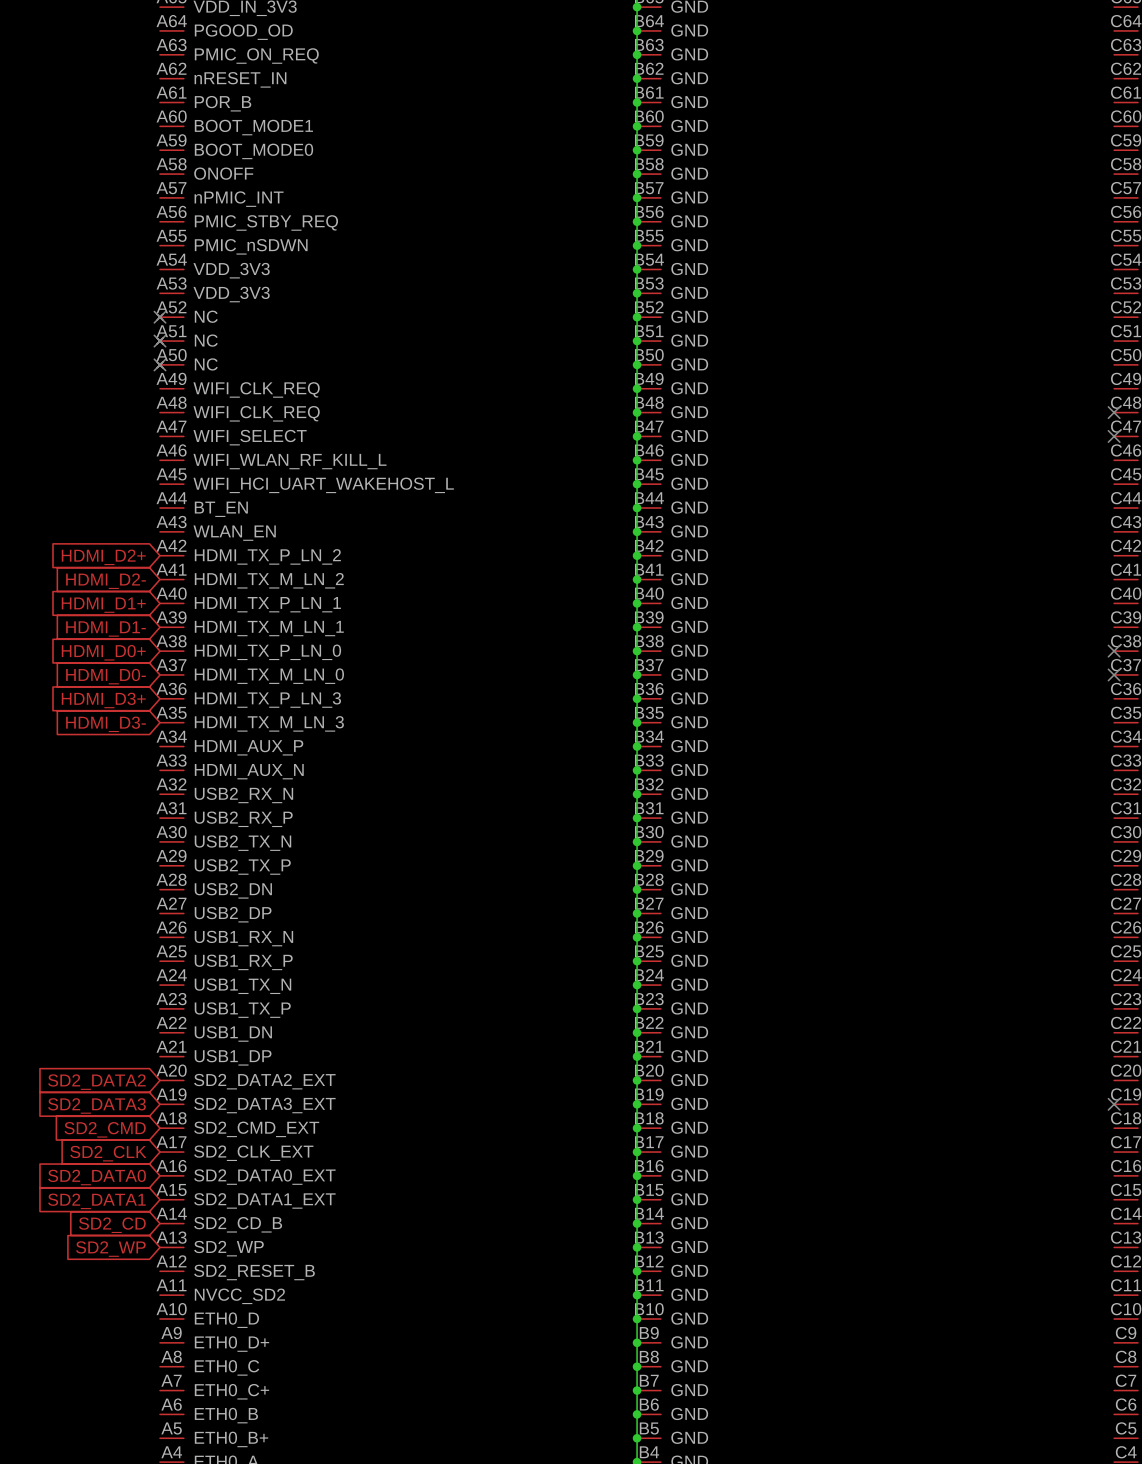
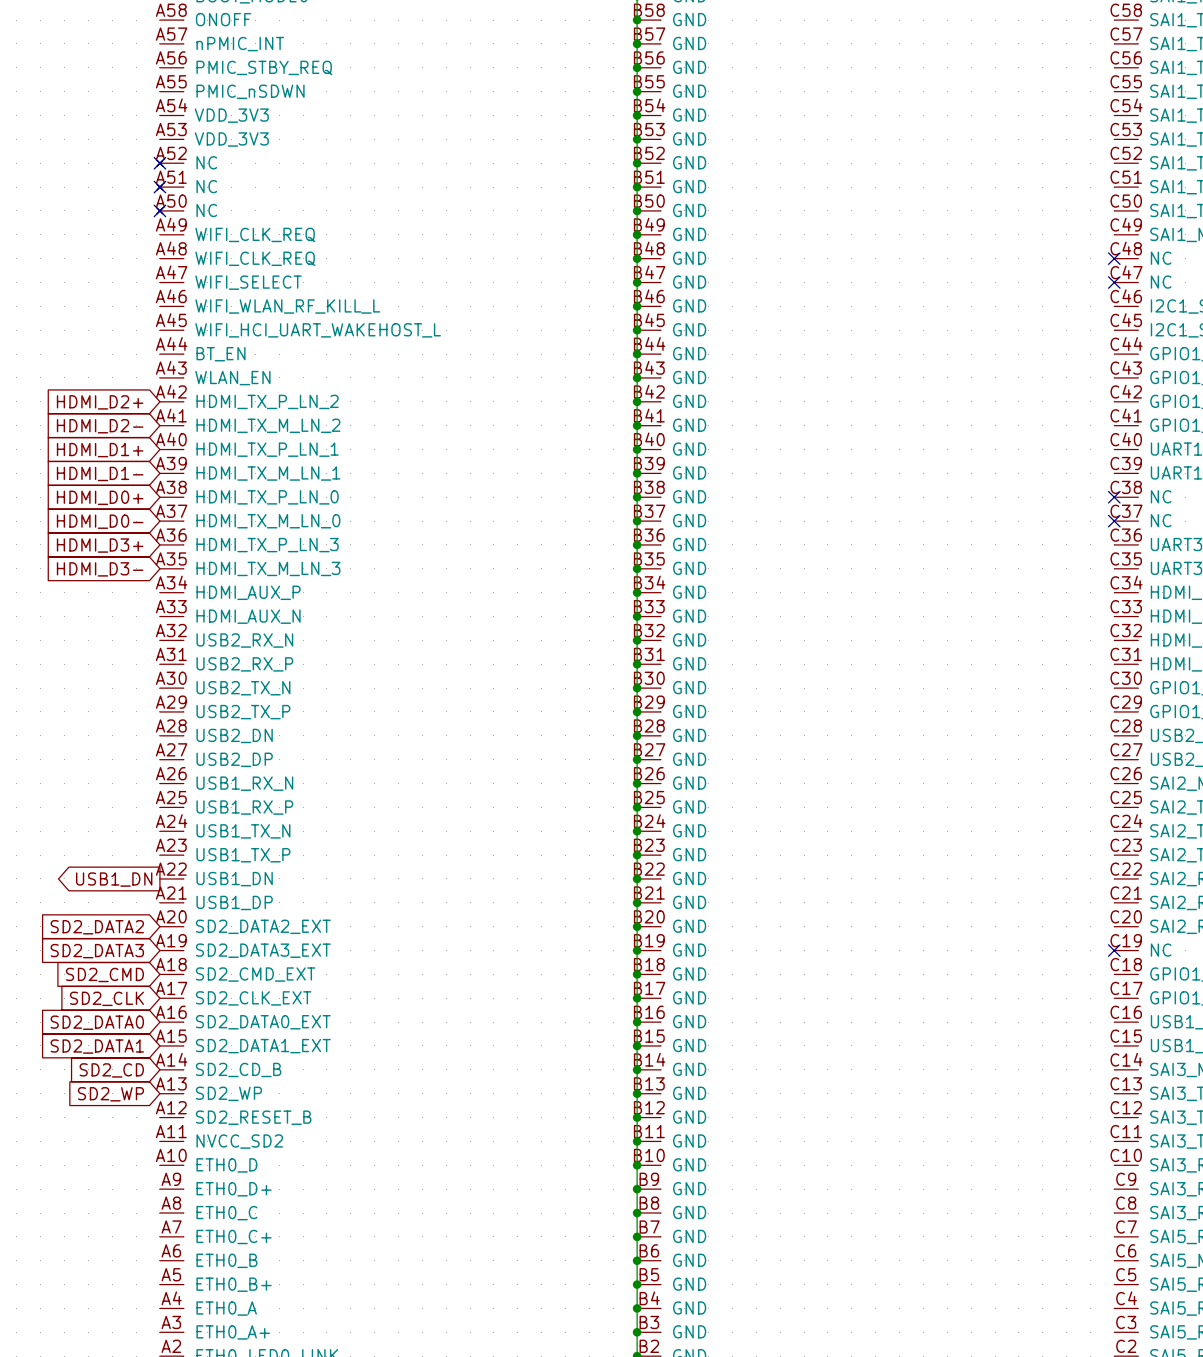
global label: none -> USB1_DN (114, 879)

